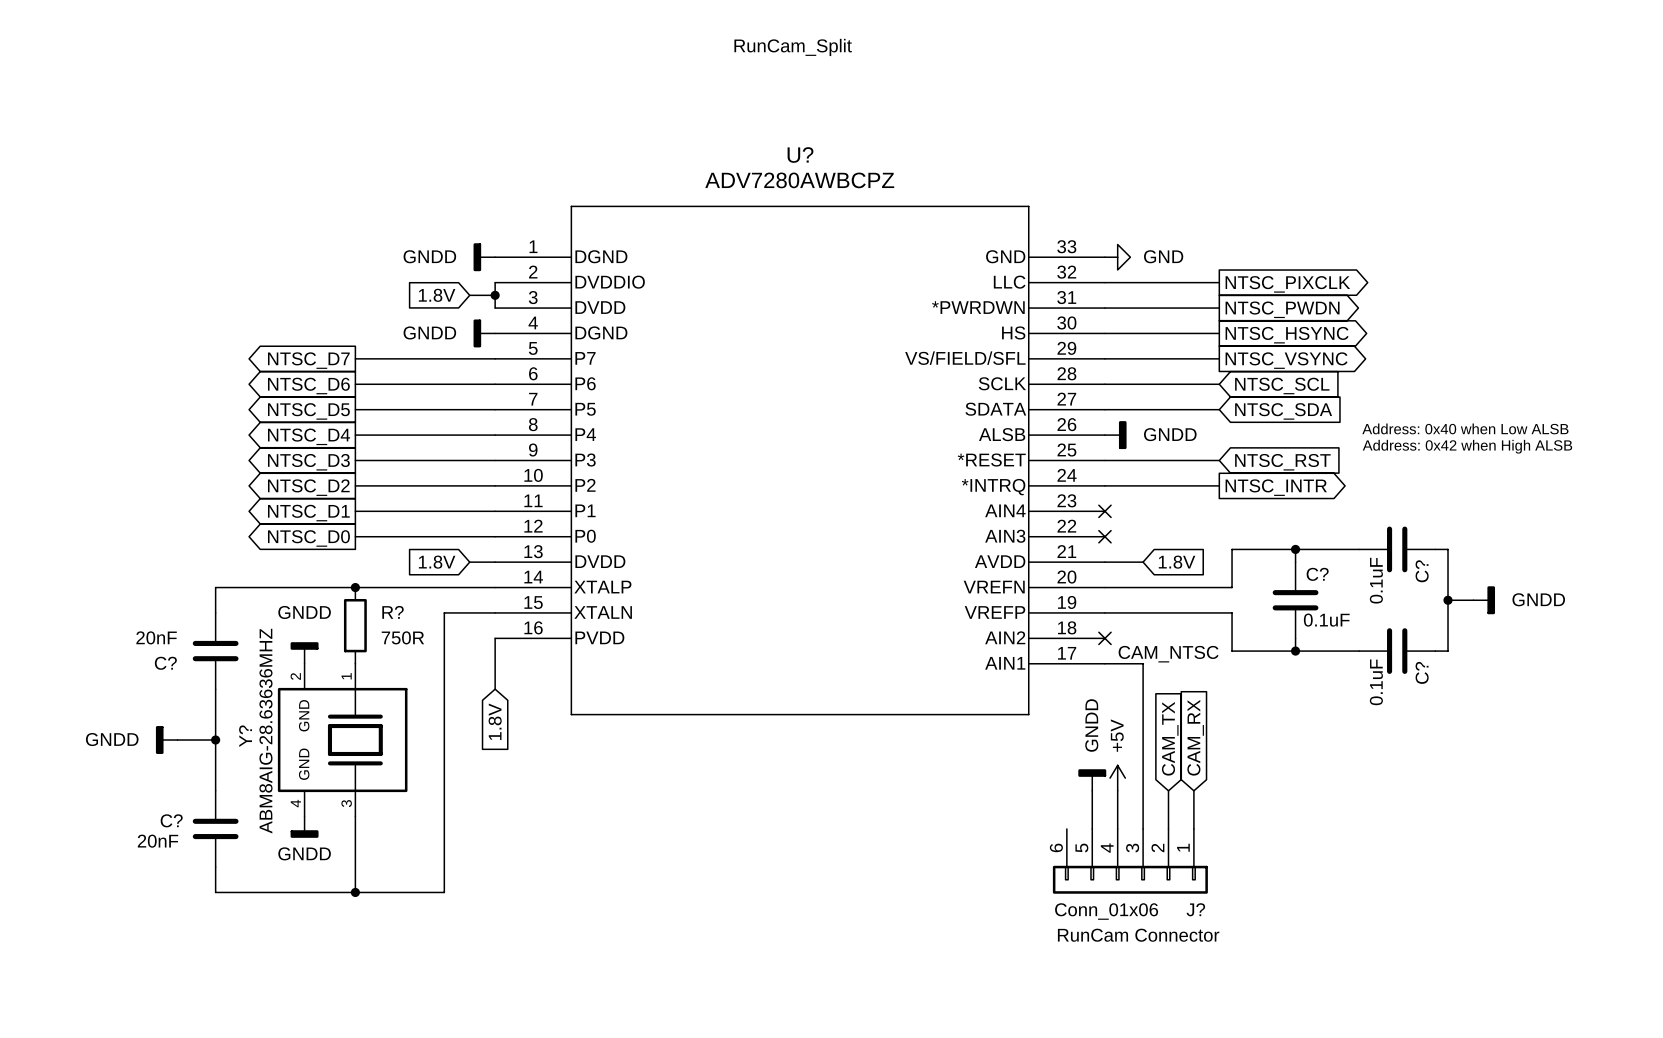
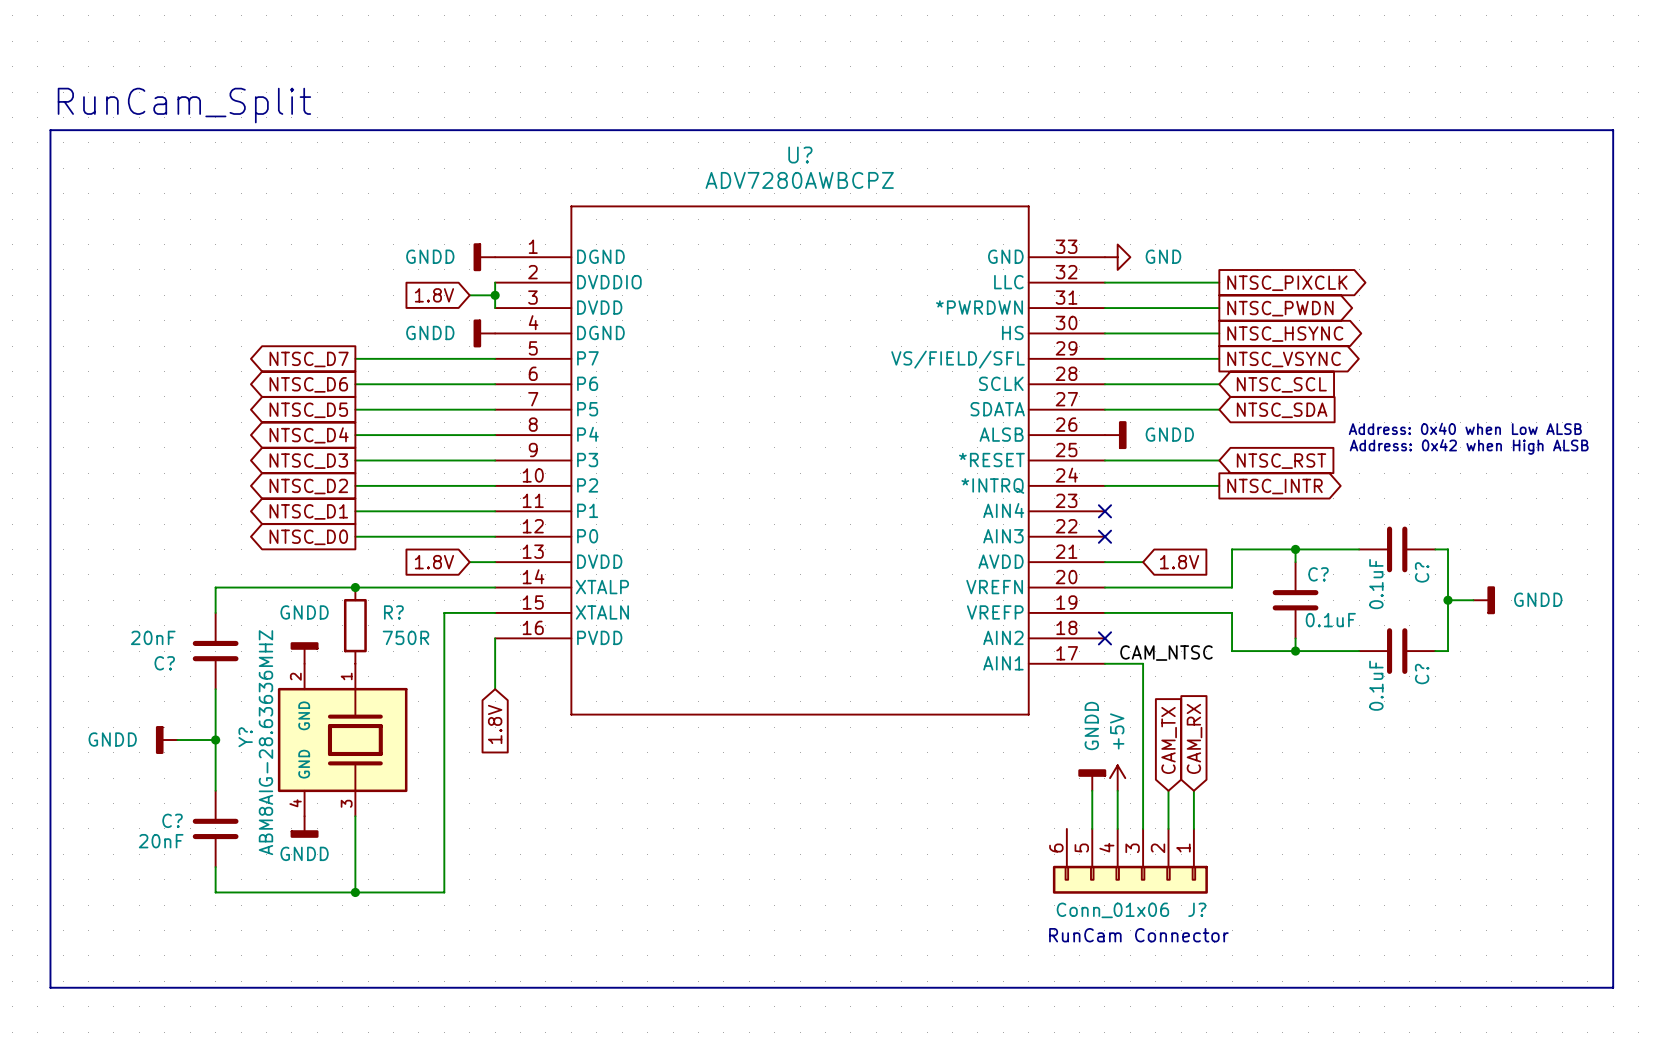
text: RunCam_Split (793, 47) -> none
text: none -> RunCam_Split (184, 105)
line: none -> (50, 130) (1613, 130) (1613, 987) (50, 987) (50, 130)

